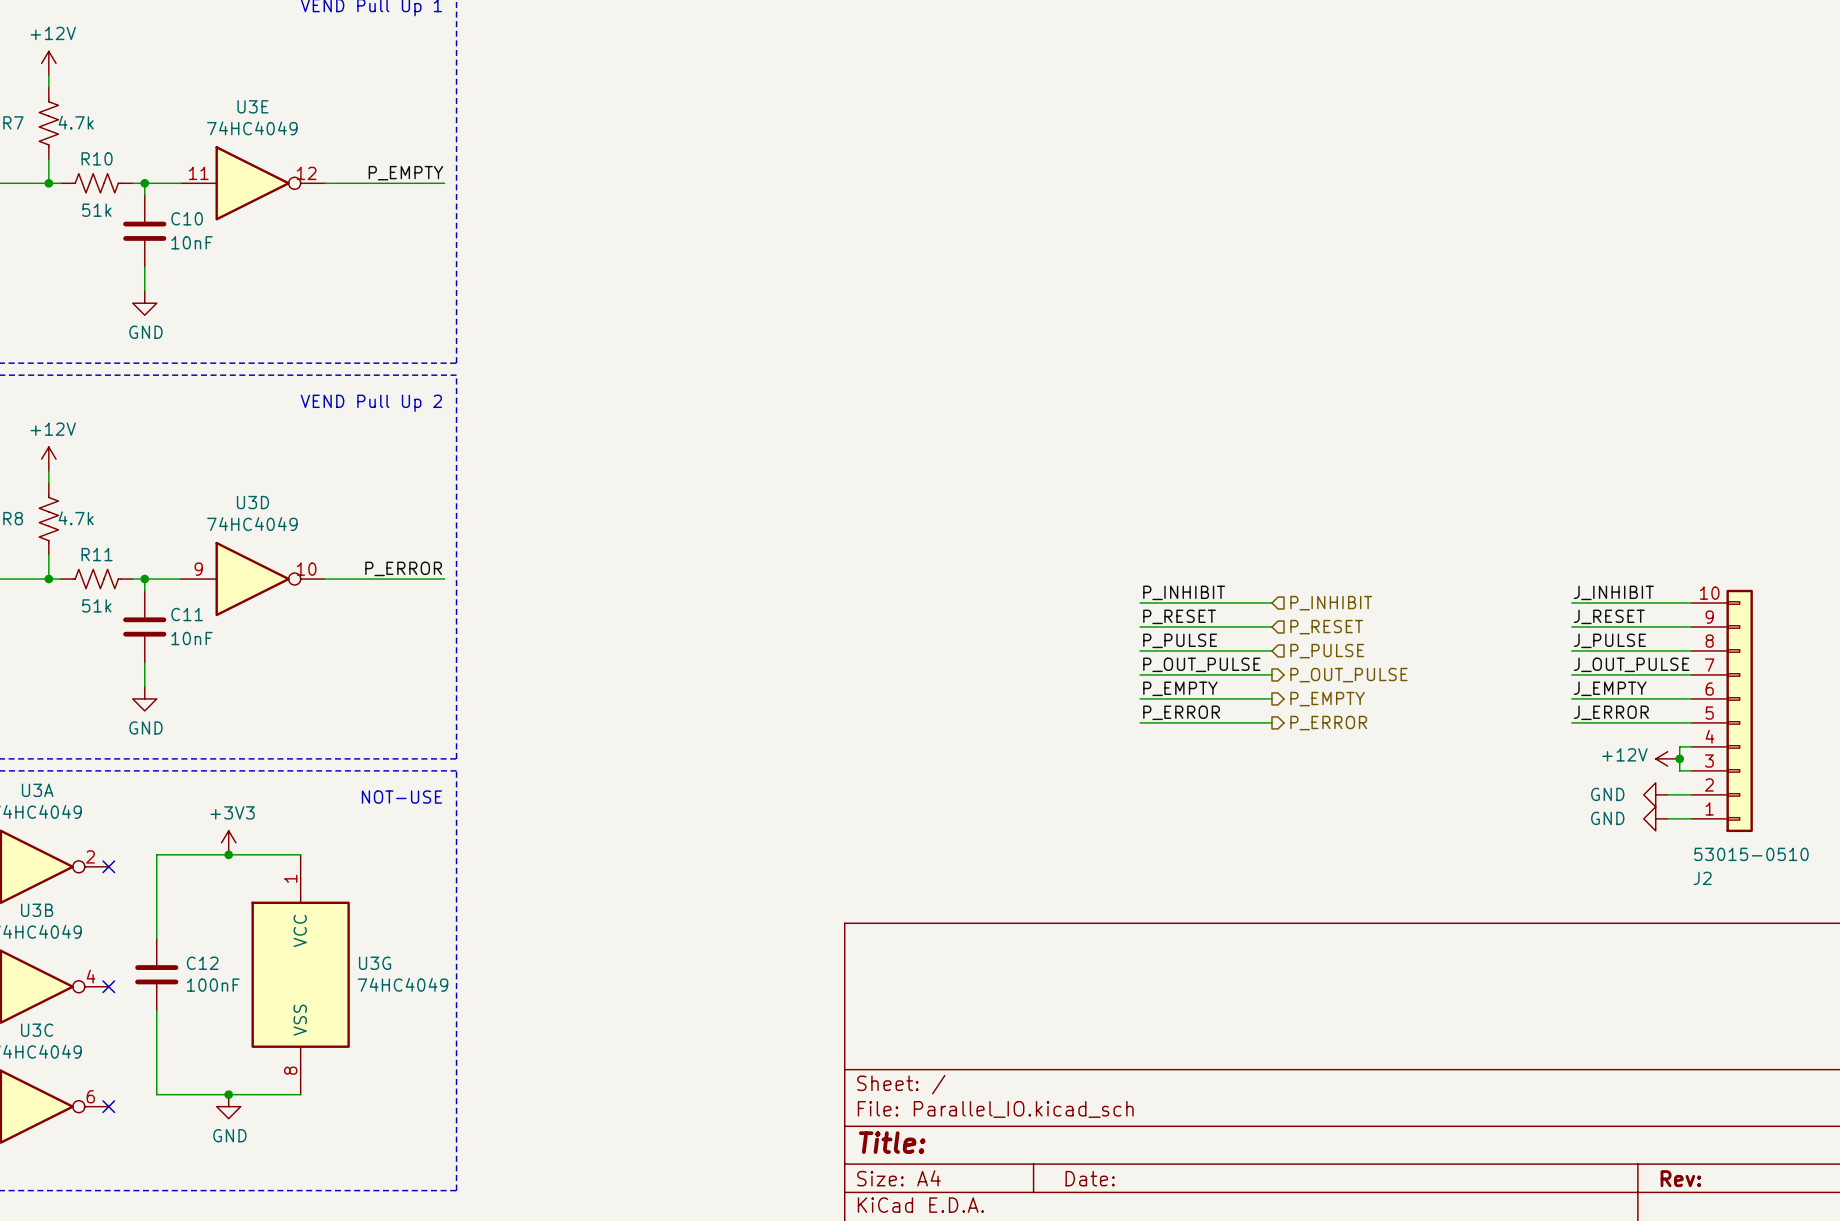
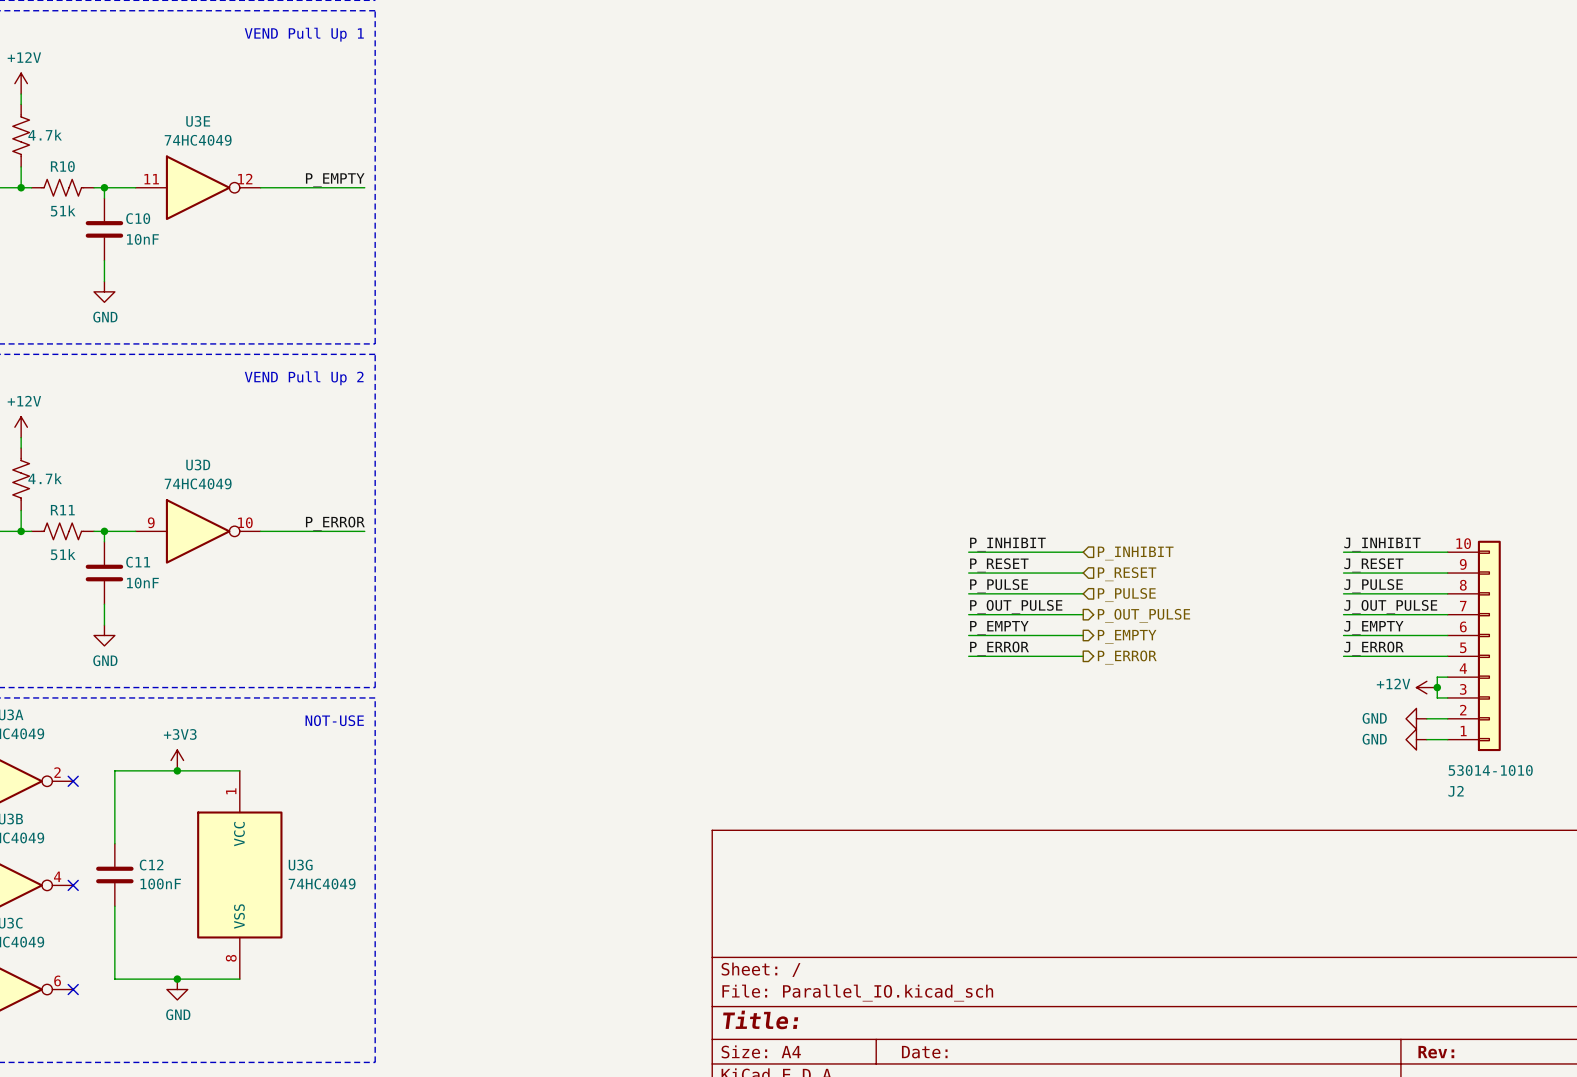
J2 value: 53015-0510 (1751, 854) -> 53014-1010 (1490, 770)

